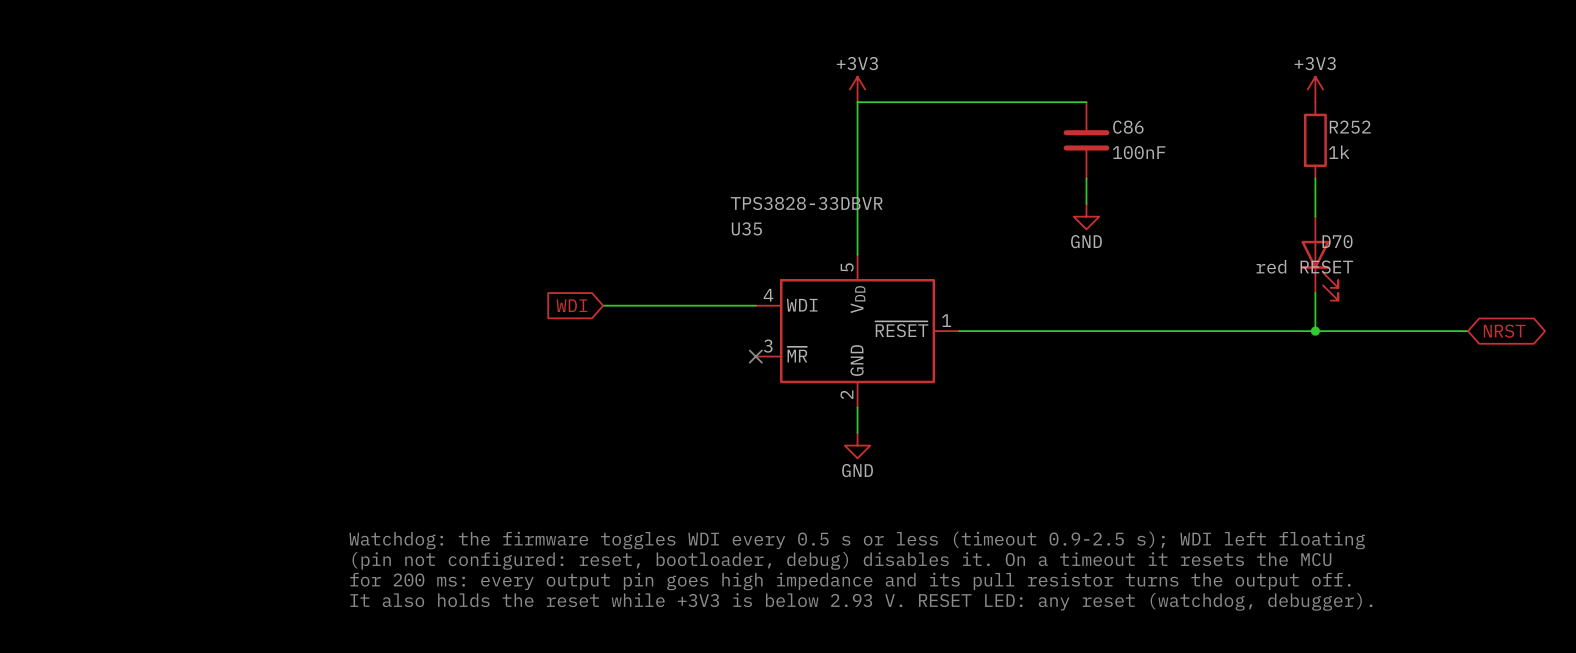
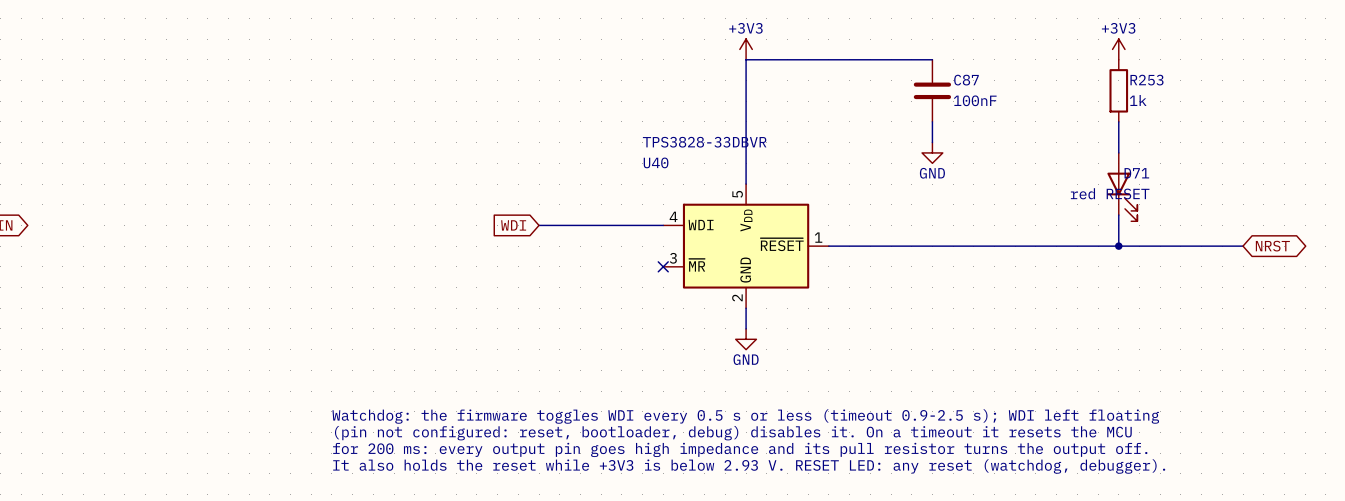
C86 name: C86 (1128, 127) -> C87 (966, 80)
R252 name: R252 (1350, 127) -> R253 (1146, 80)
U35 name: U35 (746, 228) -> U40 (656, 162)
D70 name: D70 (1337, 241) -> D71 (1136, 173)

